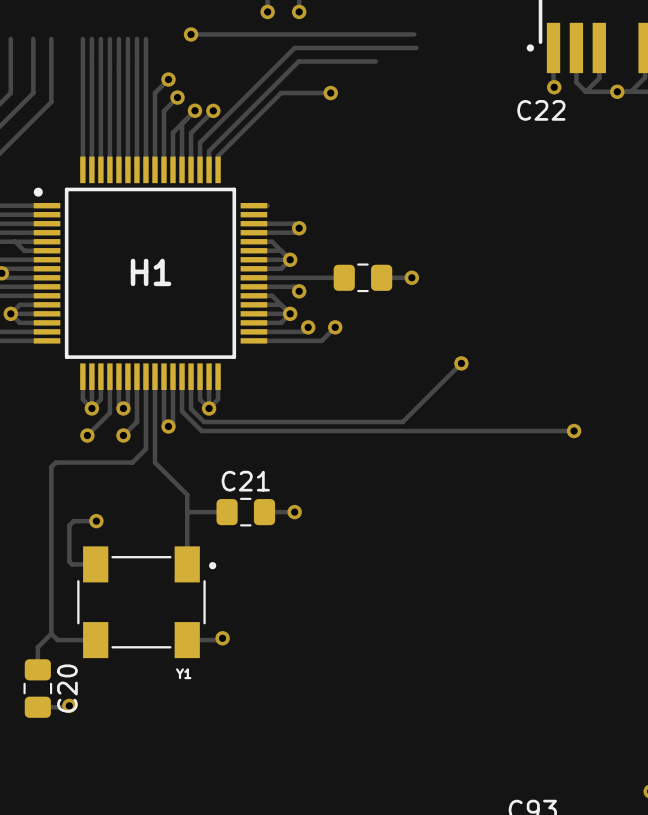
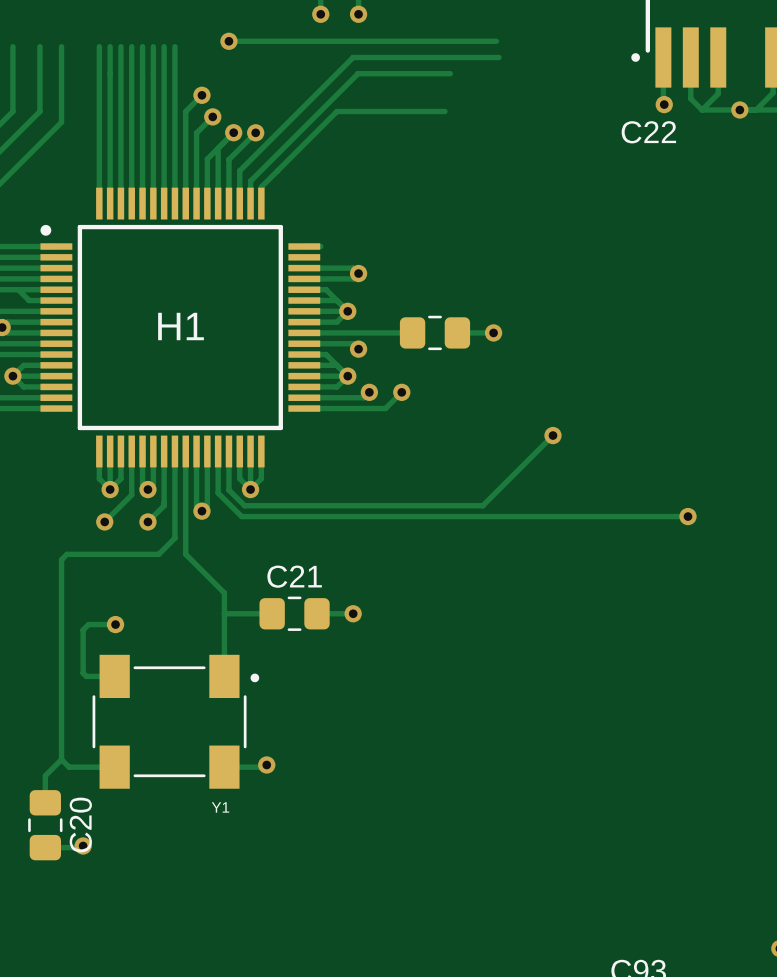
track: none -> (396, 111) (444, 111)
via: (330, 93) -> none

